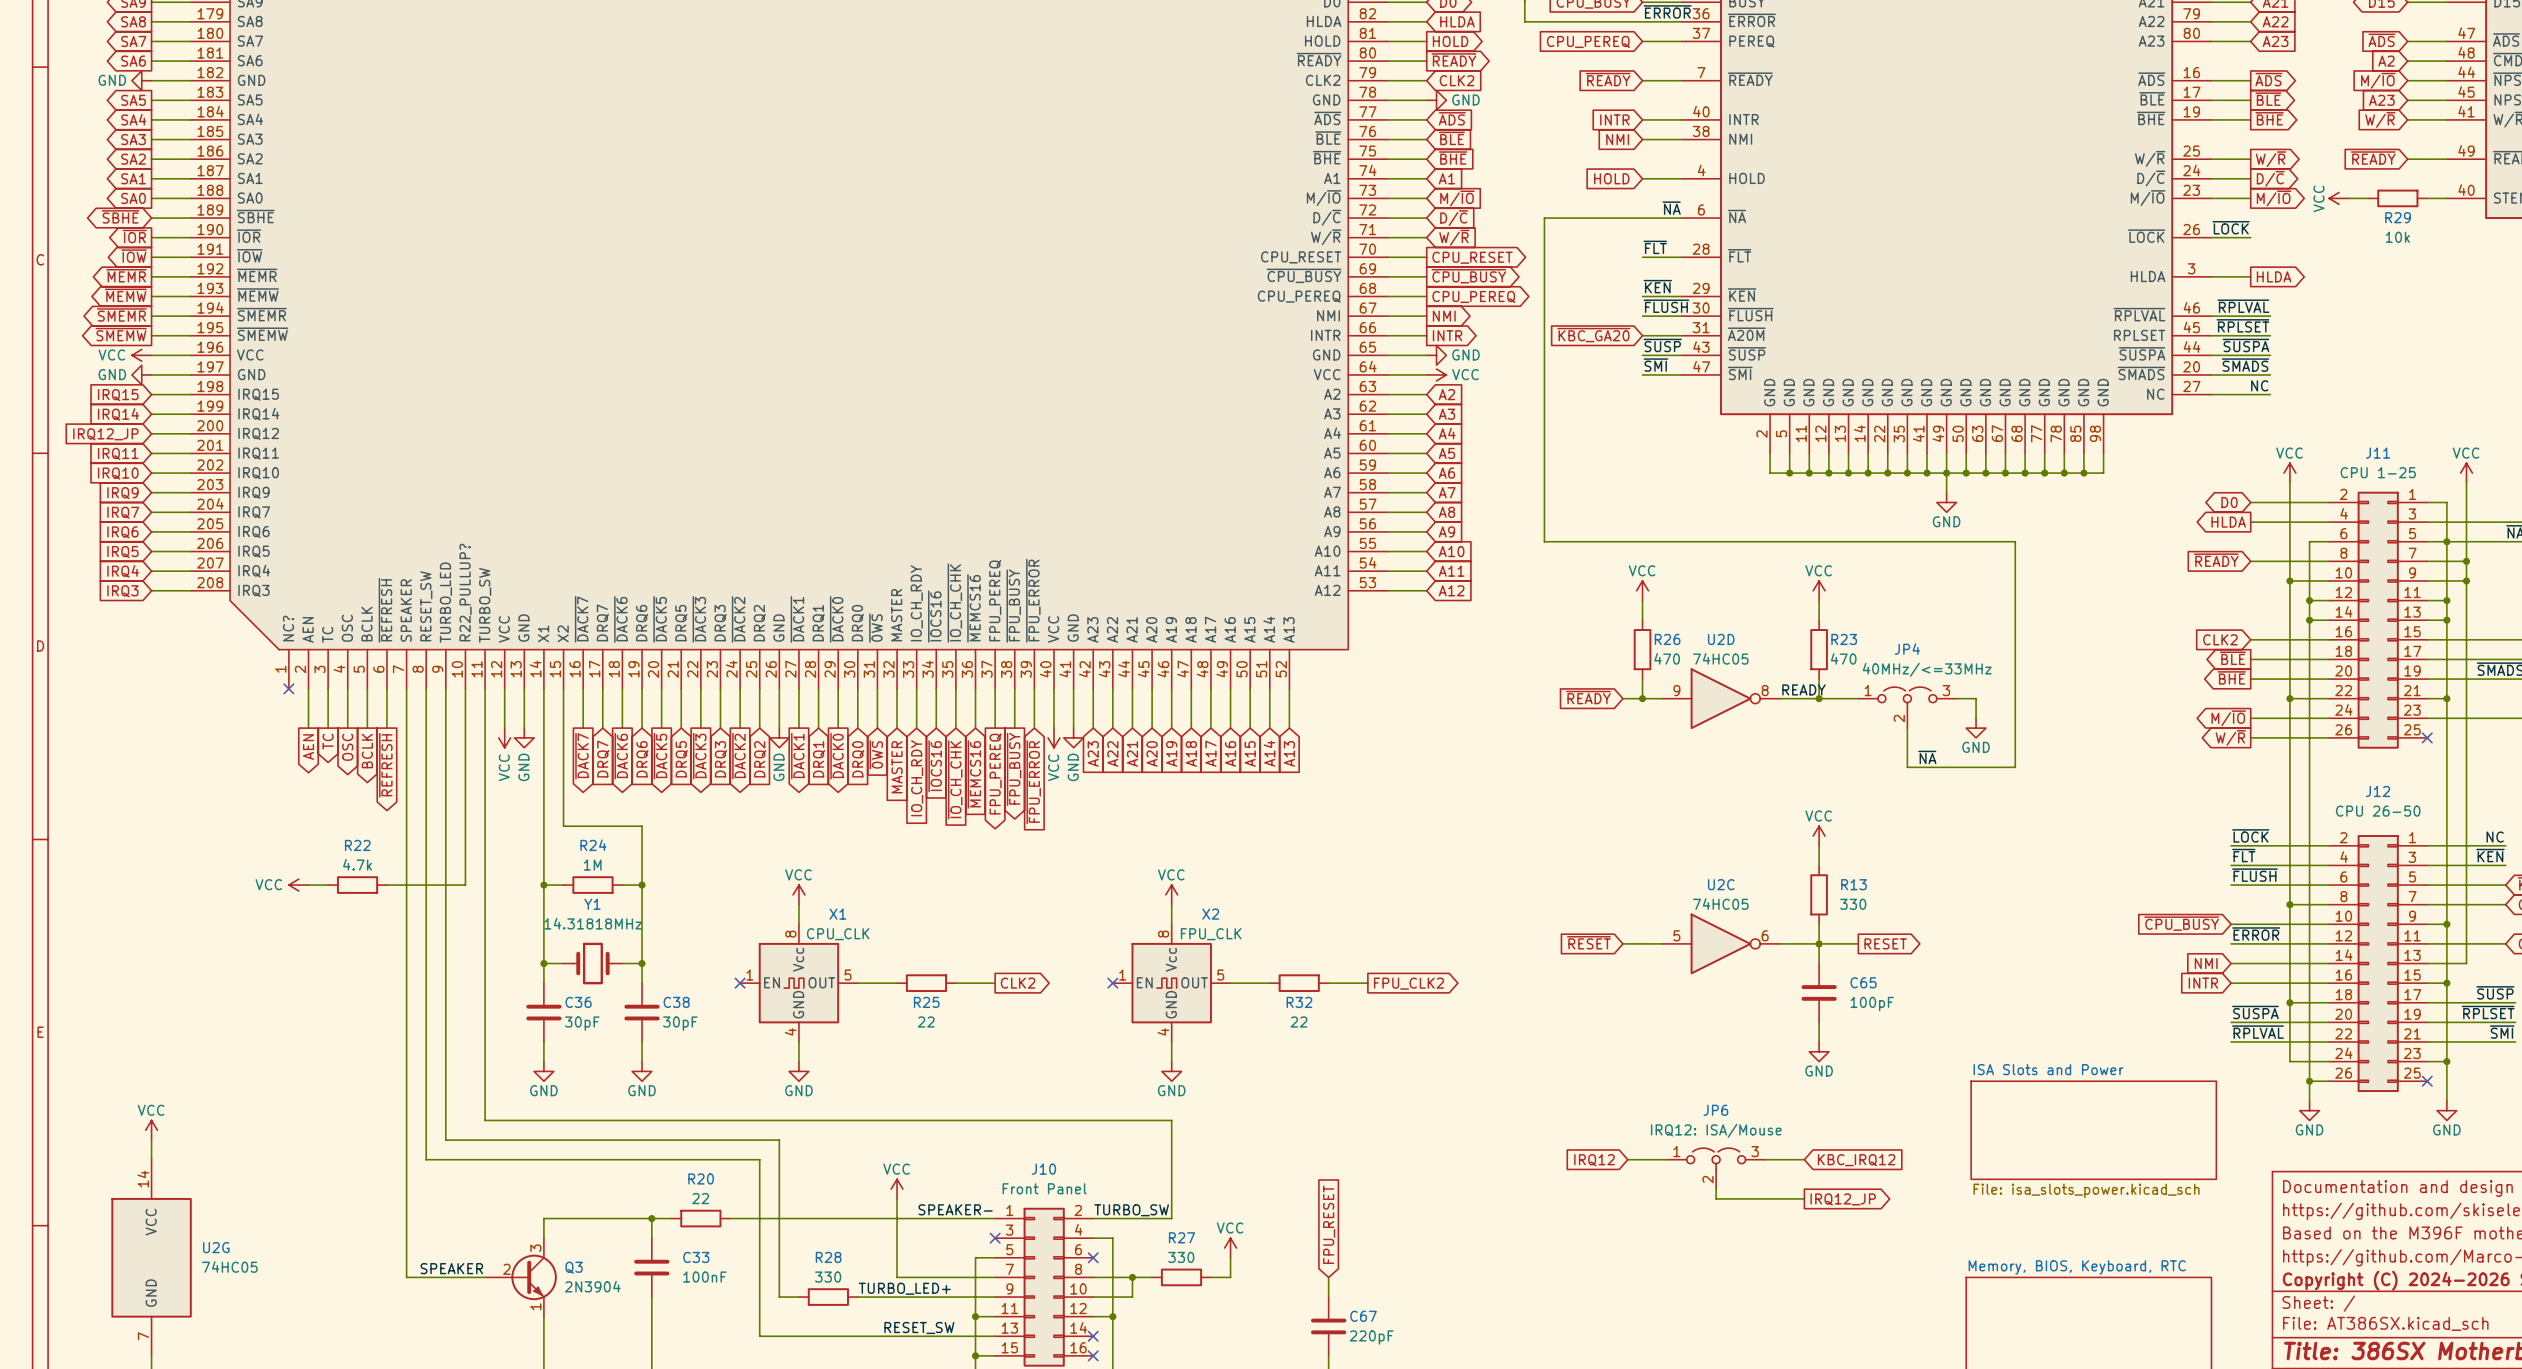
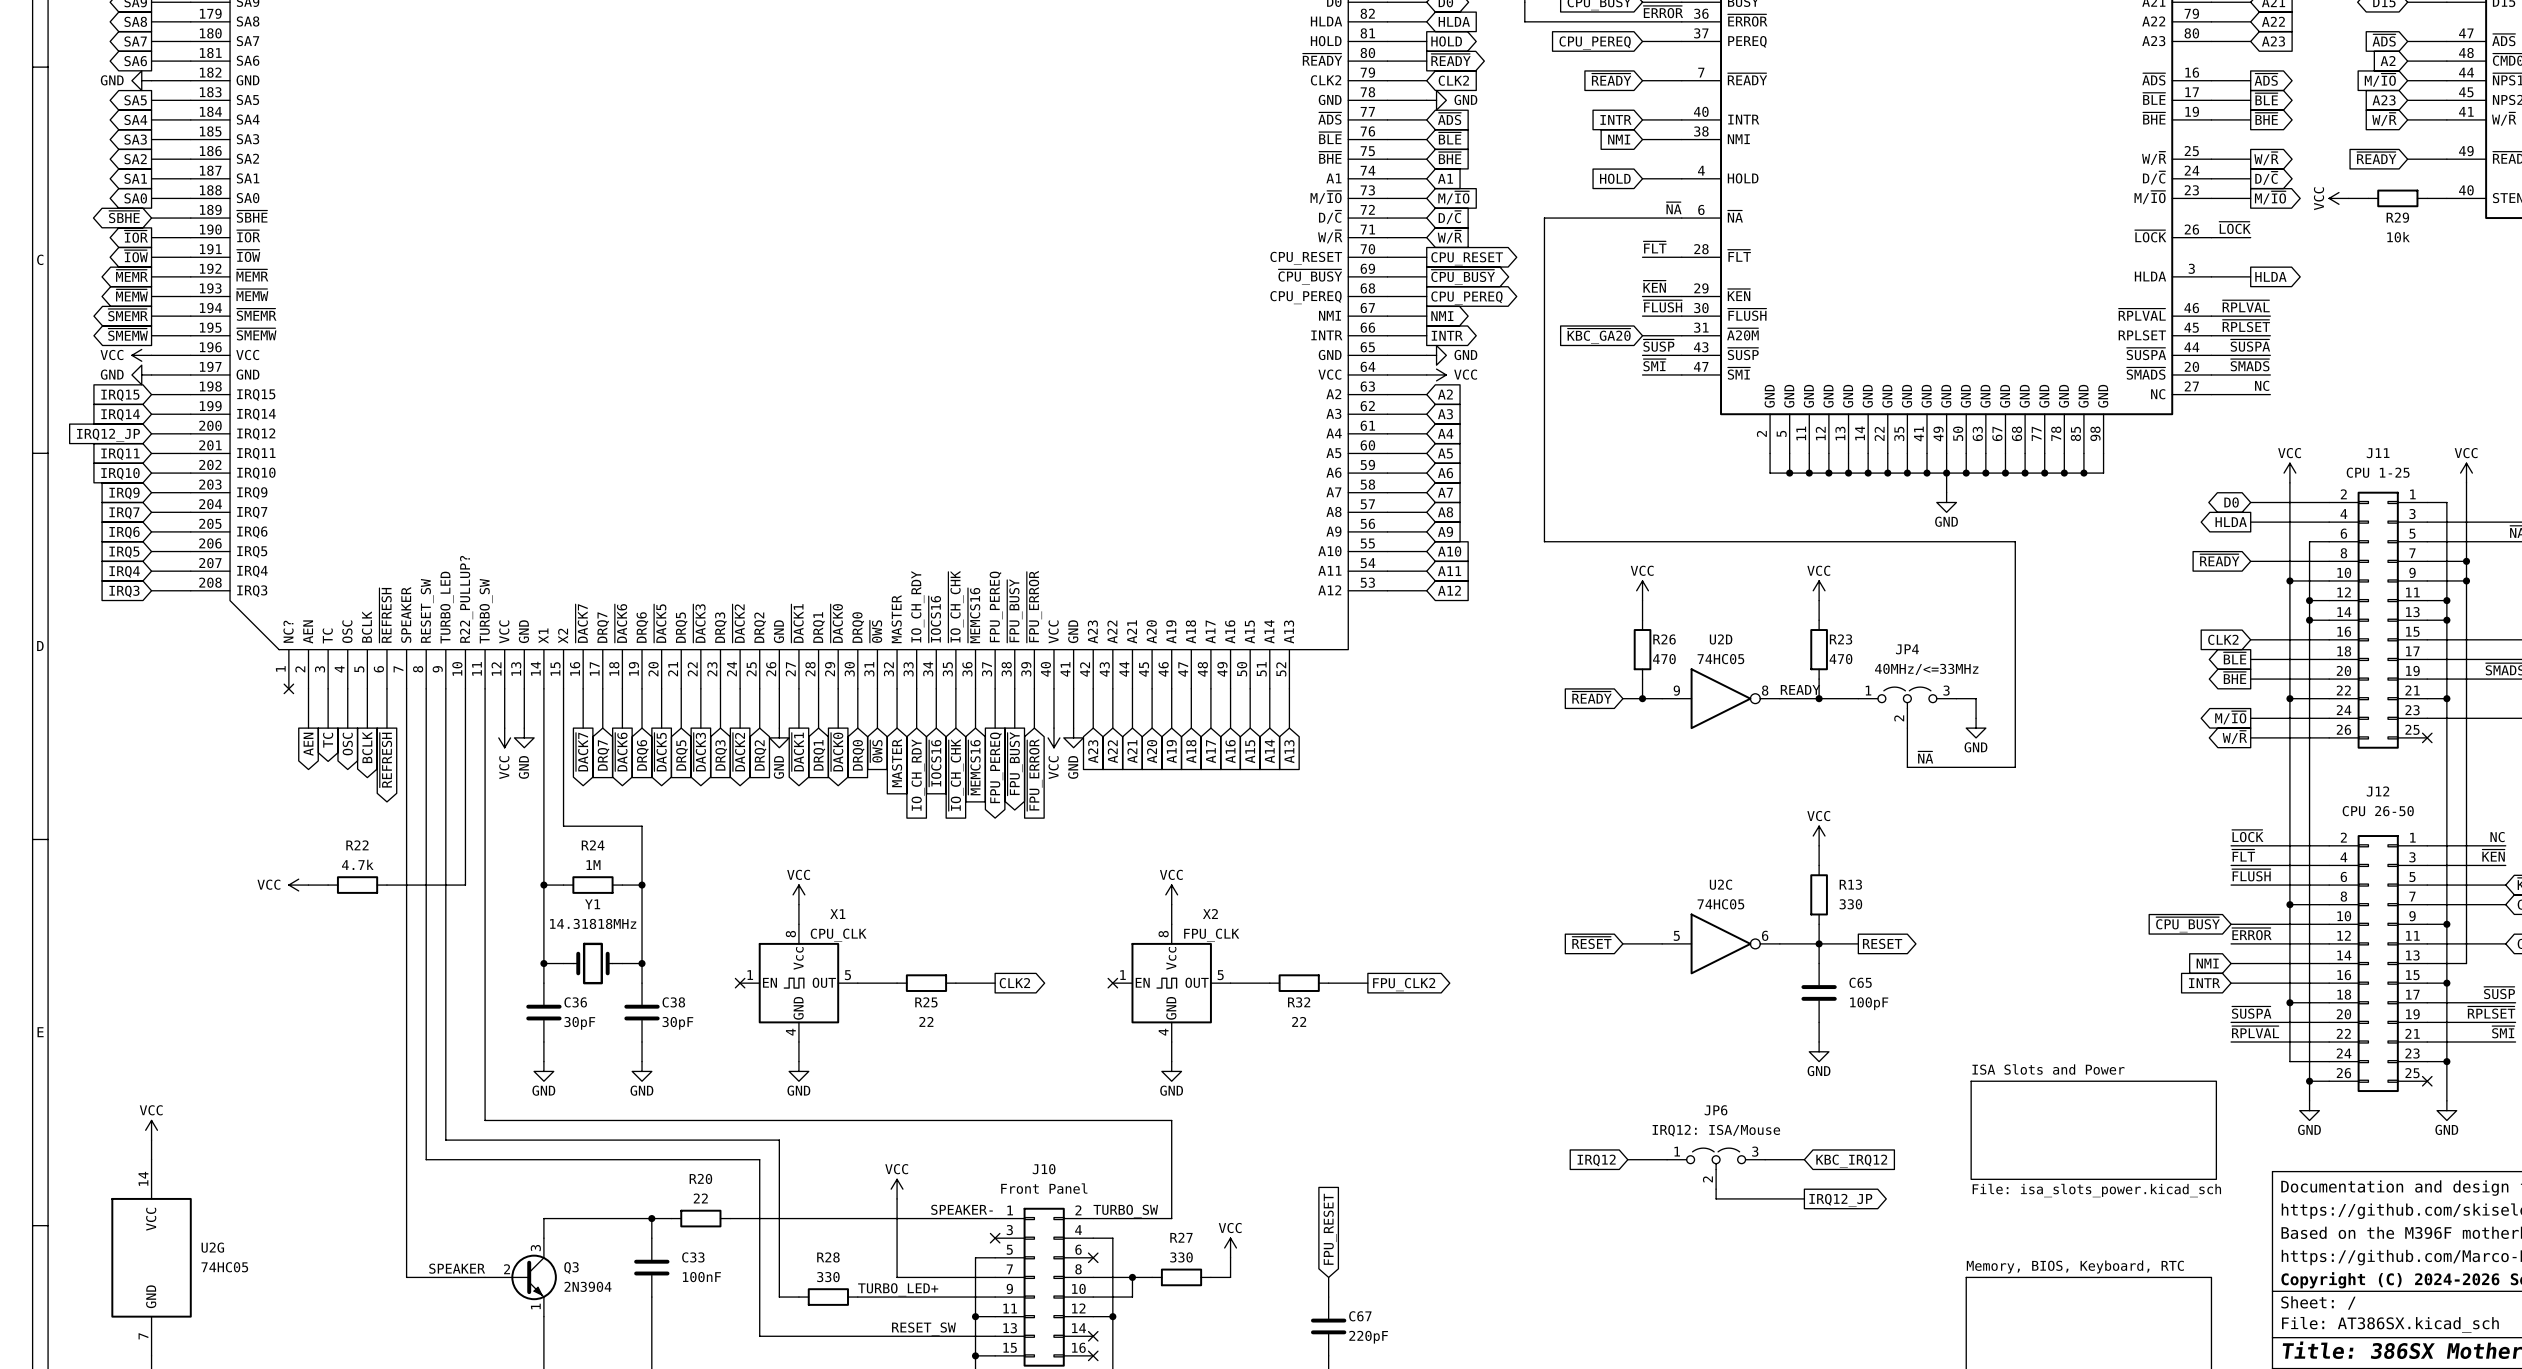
junction: (2446, 541) -> none

